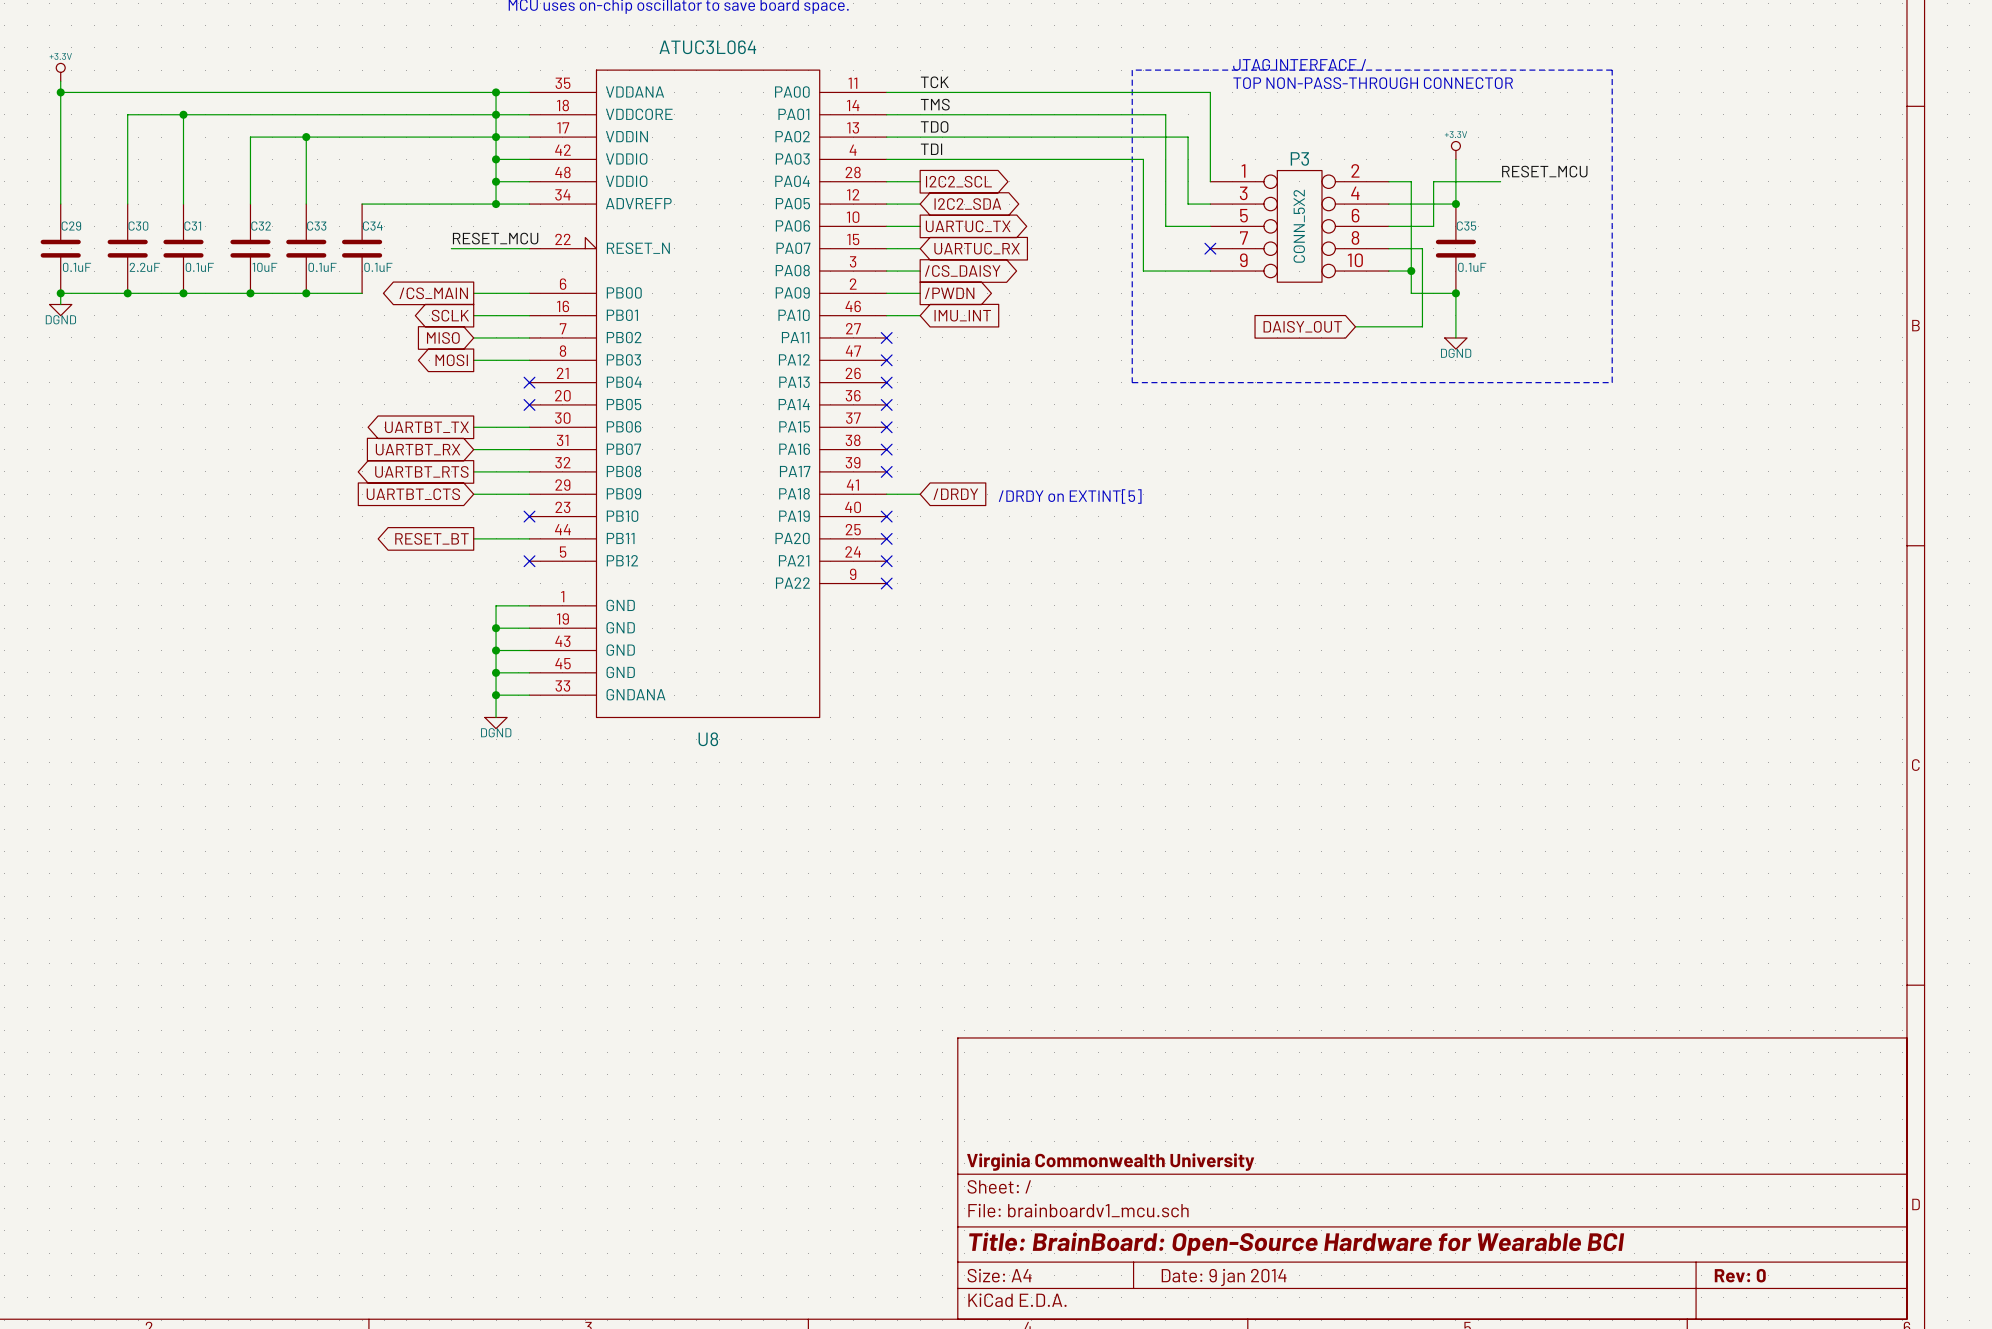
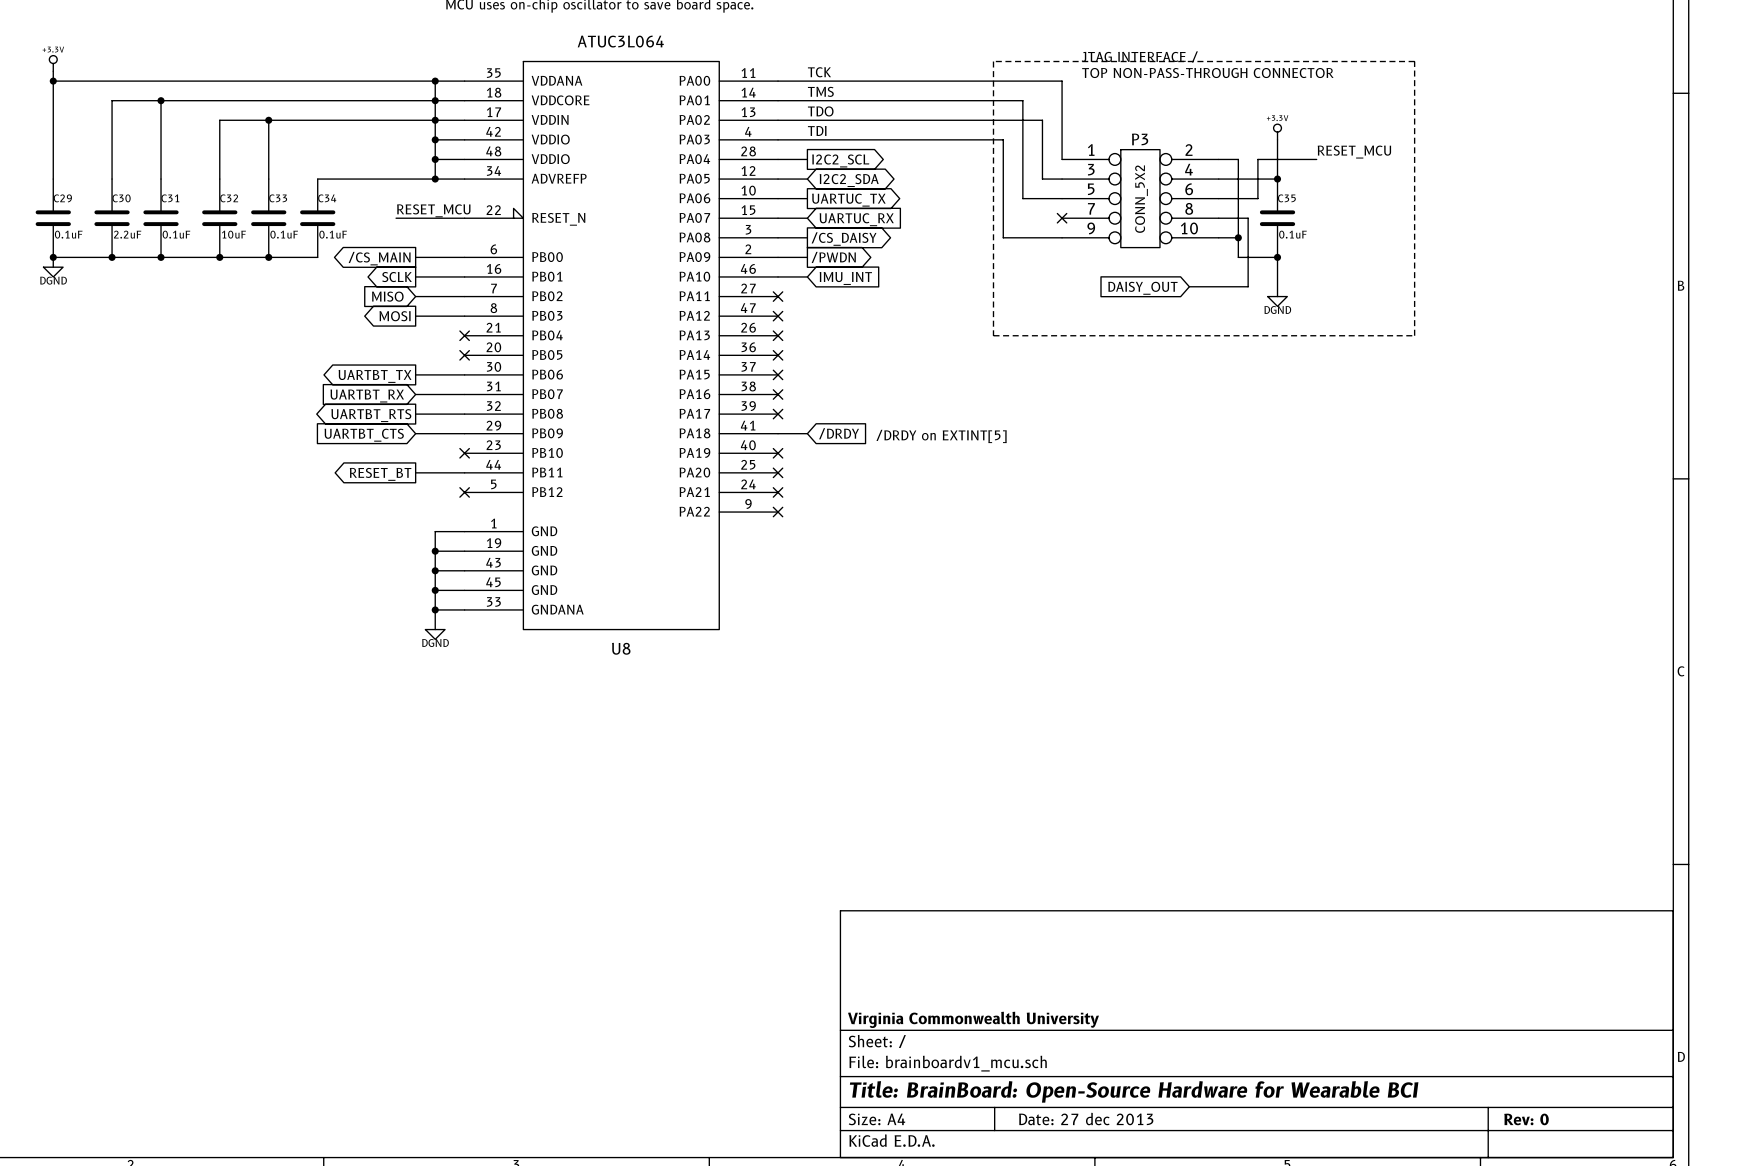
title block: Date: 9 jan 2014 (1224, 1277) -> Date: 27 dec 2013 (1086, 1119)

